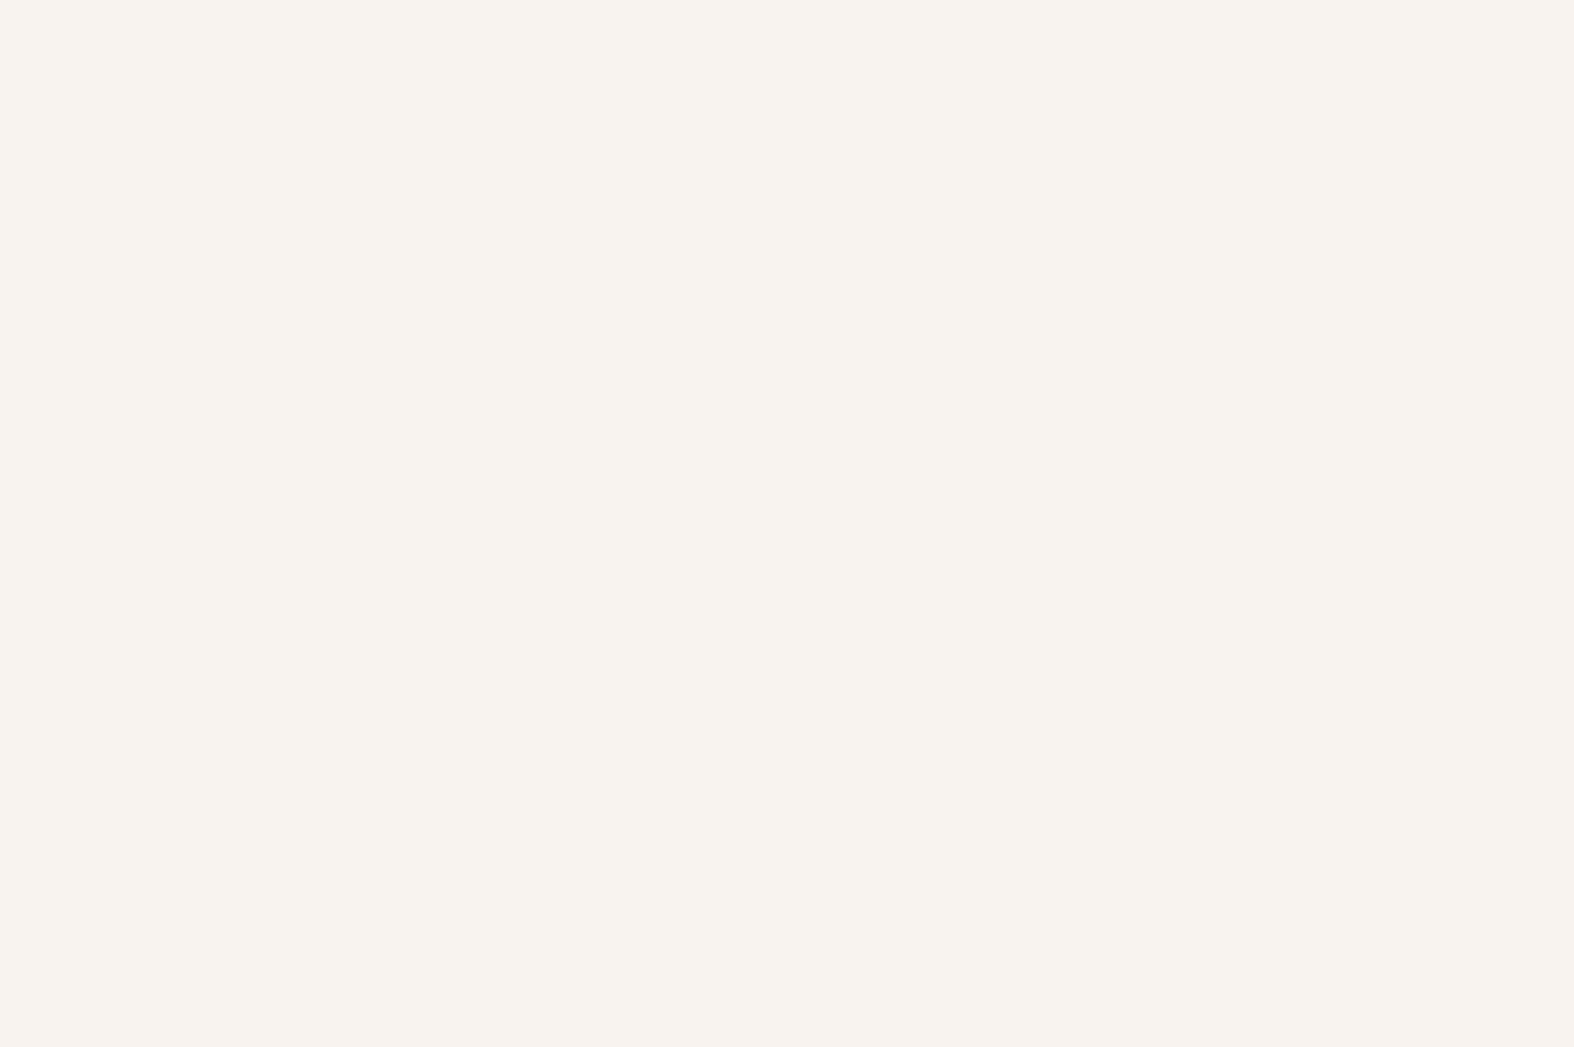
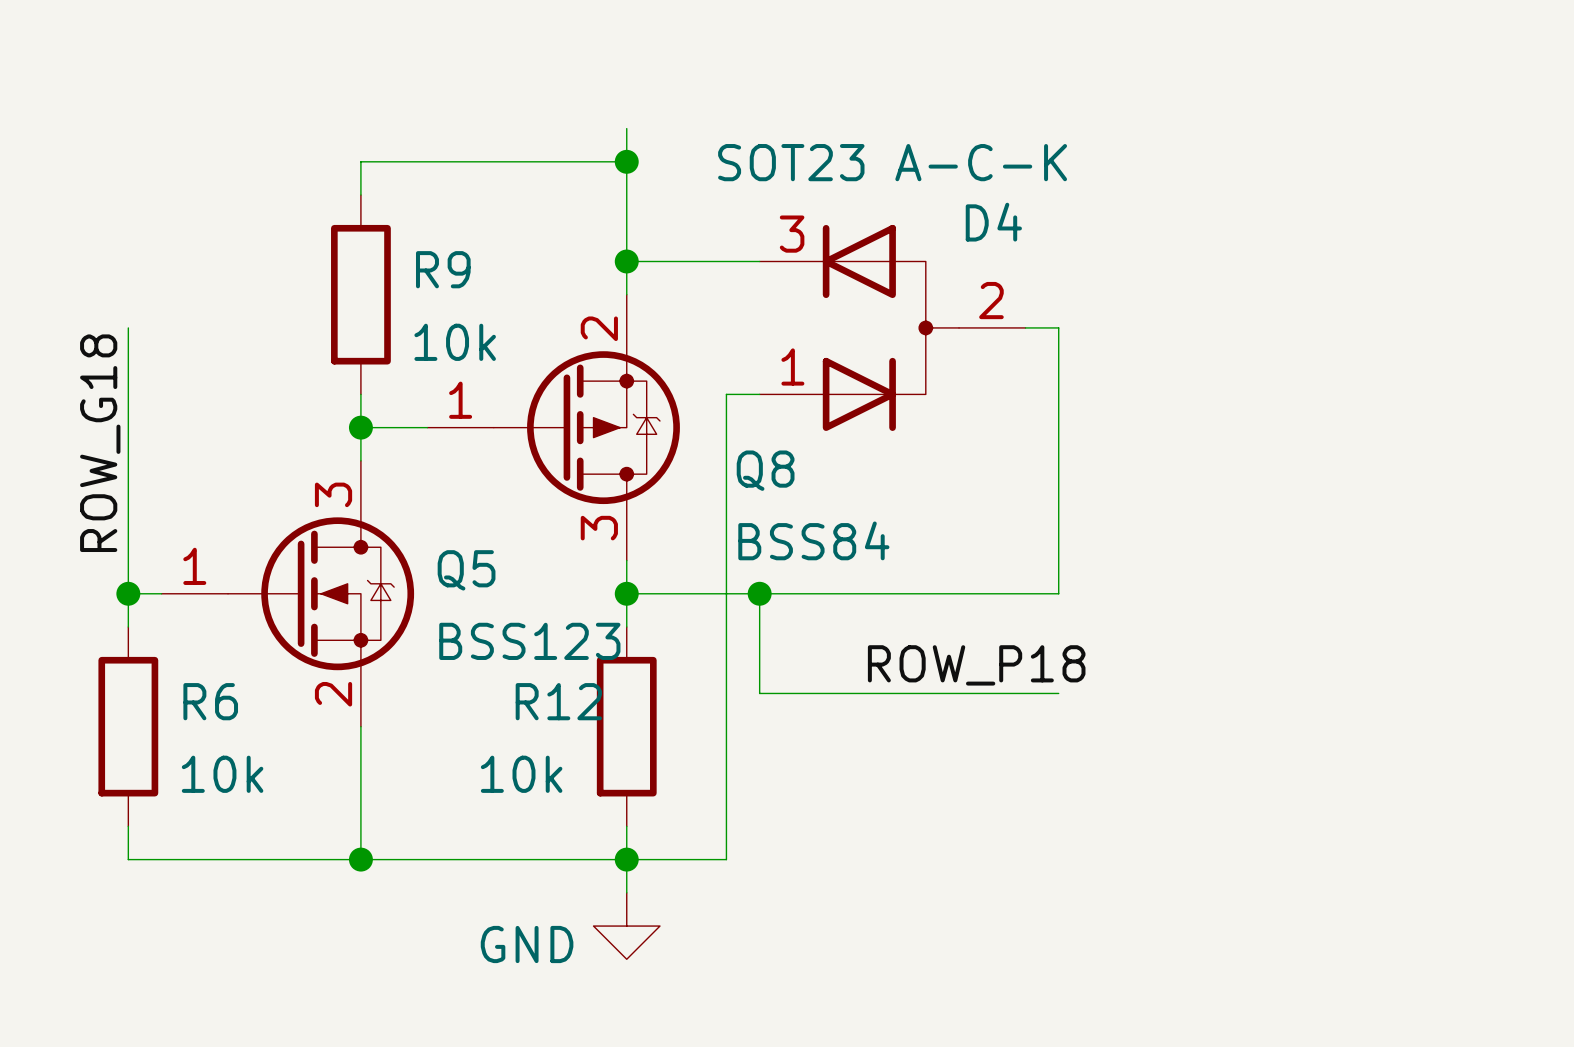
wire: none -> (626, 128) (626, 294)
wire: none -> (626, 161) (360, 161) (360, 195)
junction: none -> (626, 161)
wire: none -> (626, 261) (759, 261)
junction: none -> (626, 261)
R9: none -> 10k (360, 294)
wire: none -> (128, 327) (128, 627)
D4: none -> SOT23 A-C-K (892, 327)
wire: none -> (1025, 327) (1058, 327) (1058, 593) (626, 593)
wire: none -> (360, 394) (360, 460)
wire: none -> (759, 394) (726, 394) (726, 859) (128, 859) (128, 826)
wire: none -> (360, 427) (427, 427)
junction: none -> (360, 427)
Q8: none -> BSS84 (553, 427)
label: none -> ROW_G18 (100, 443)
wire: none -> (626, 560) (626, 627)
wire: none -> (128, 593) (161, 593)
junction: none -> (128, 593)
Q5: none -> BSS123 (287, 593)
junction: none -> (626, 593)
wire: none -> (759, 593) (759, 693) (1058, 693)
junction: none -> (759, 593)
label: none -> ROW_P18 (976, 665)
R6: none -> 10k (128, 726)
wire: none -> (360, 726) (360, 859)
R12: none -> 10k (626, 726)
wire: none -> (626, 826) (626, 892)
junction: none -> (360, 859)
junction: none -> (626, 859)
power symbol: none -> GND (626, 926)

